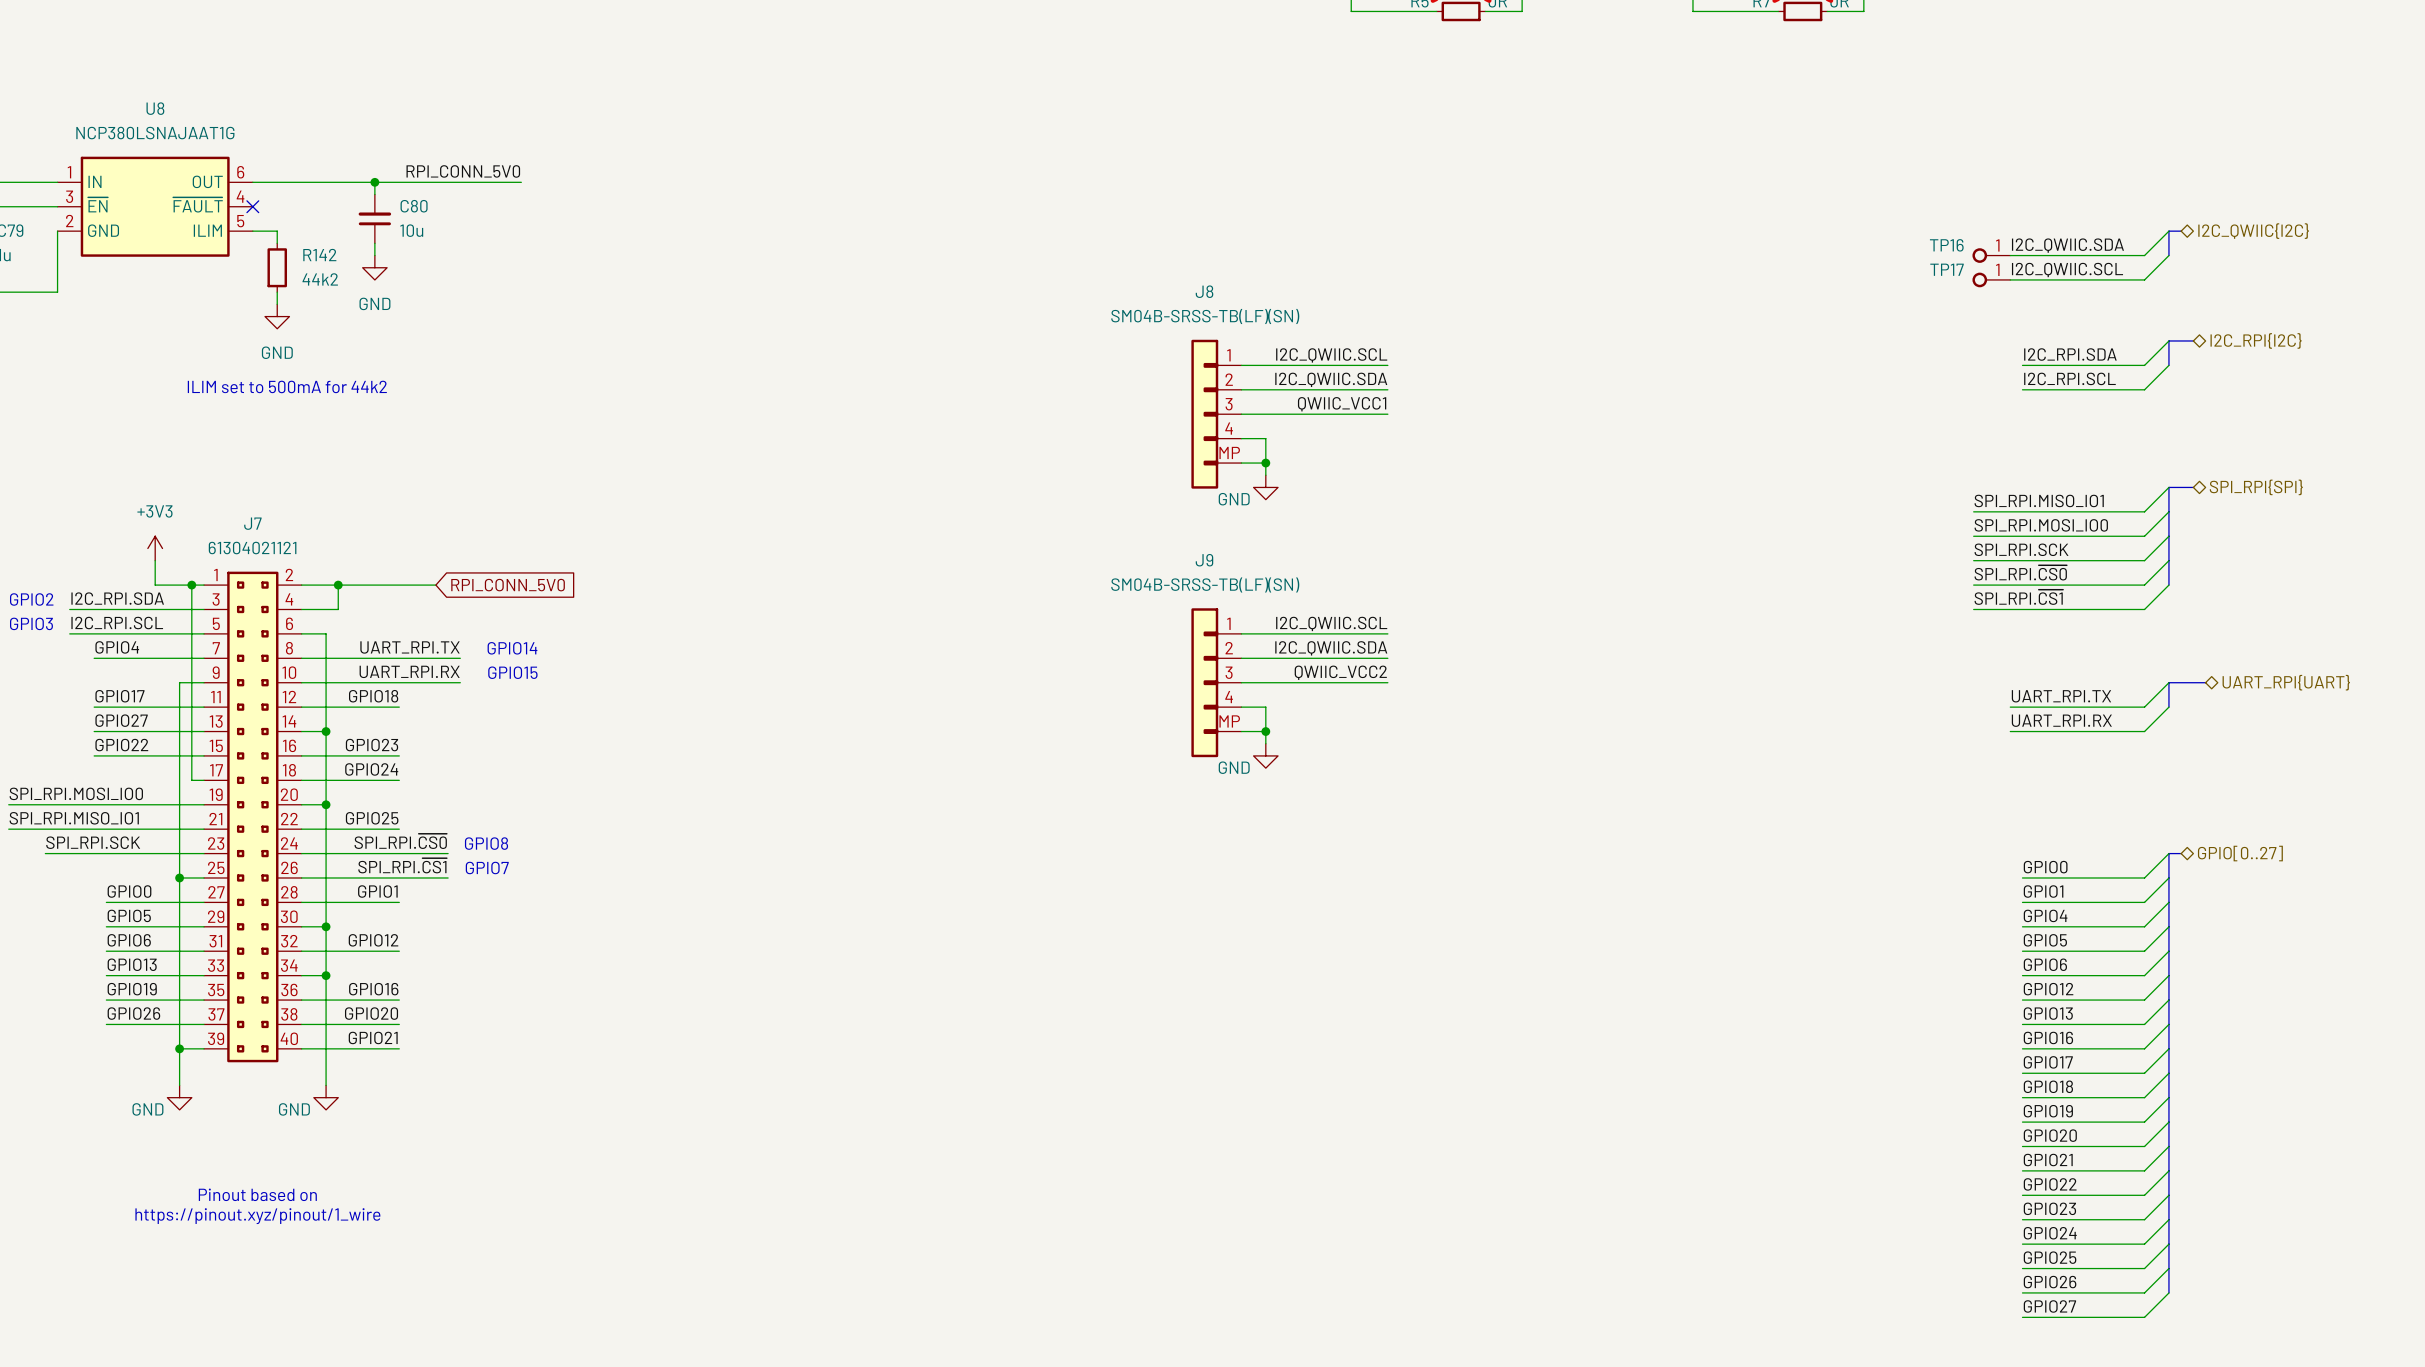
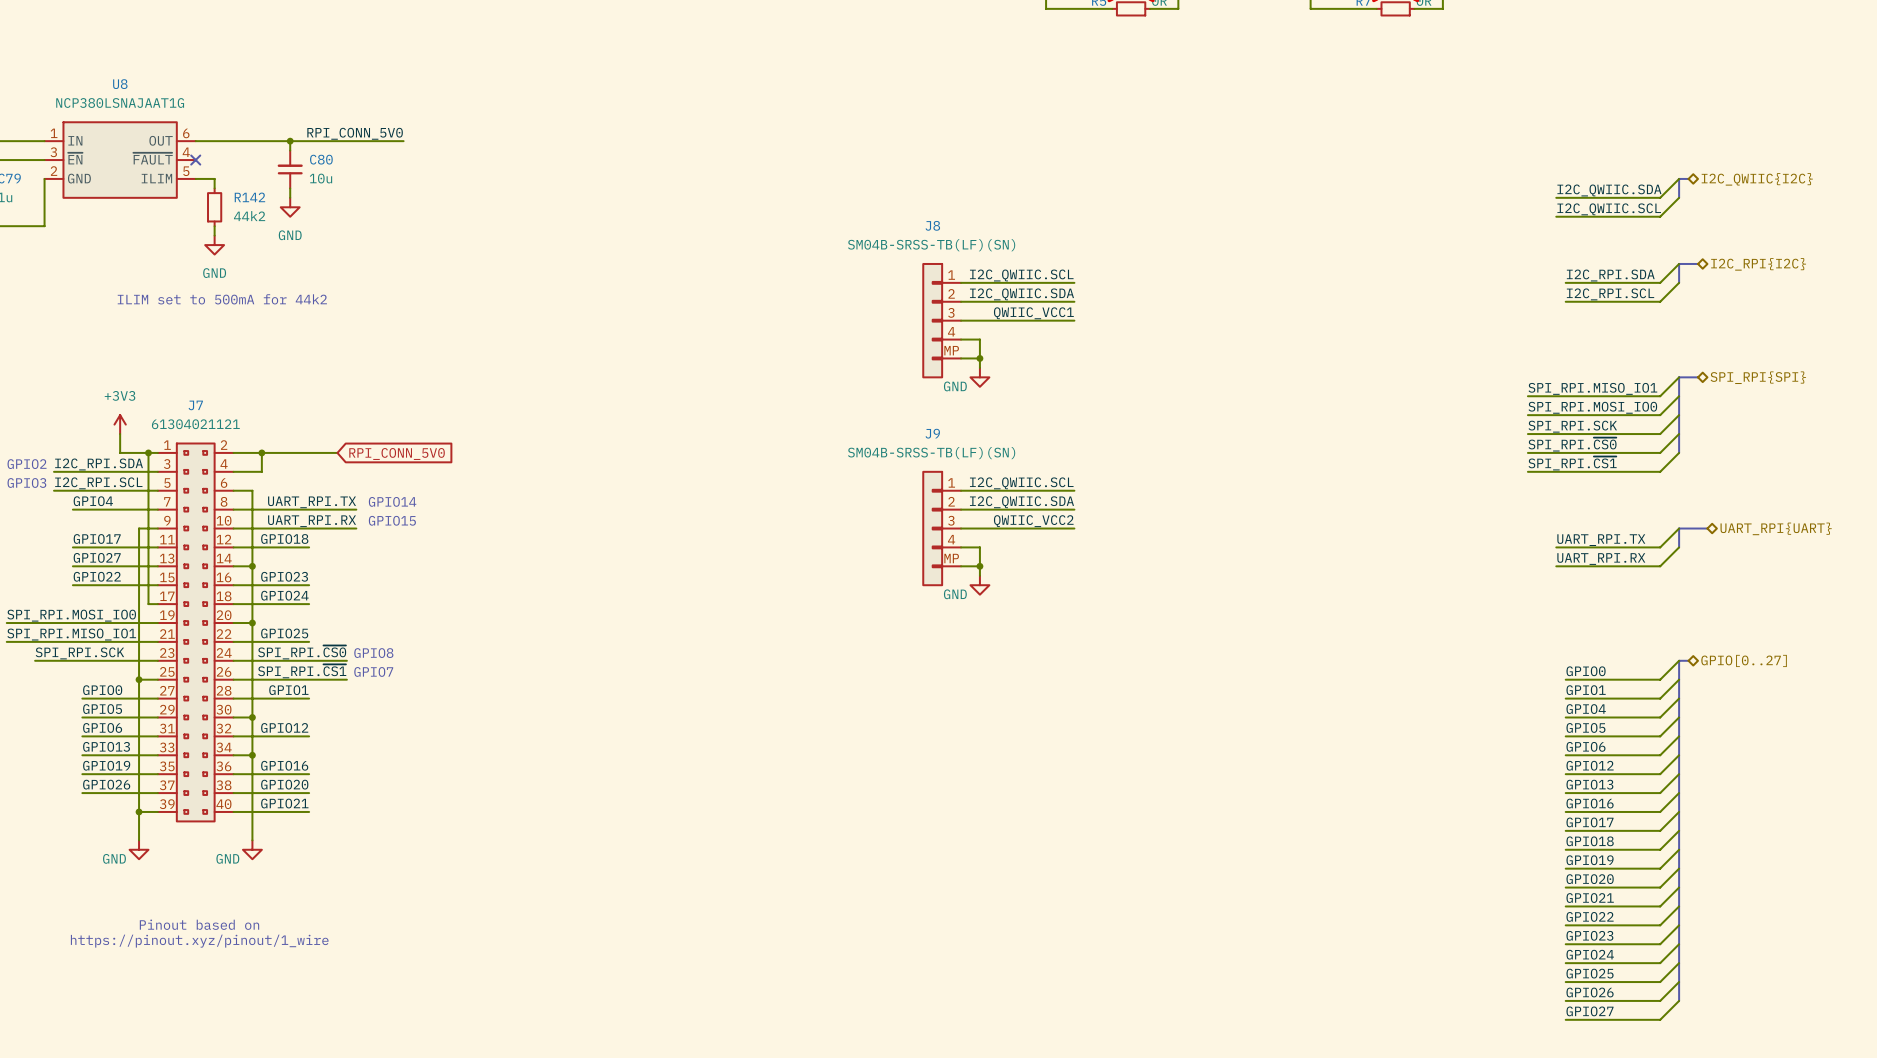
TP16: (1991, 255) -> none
TP17: (1991, 279) -> none

